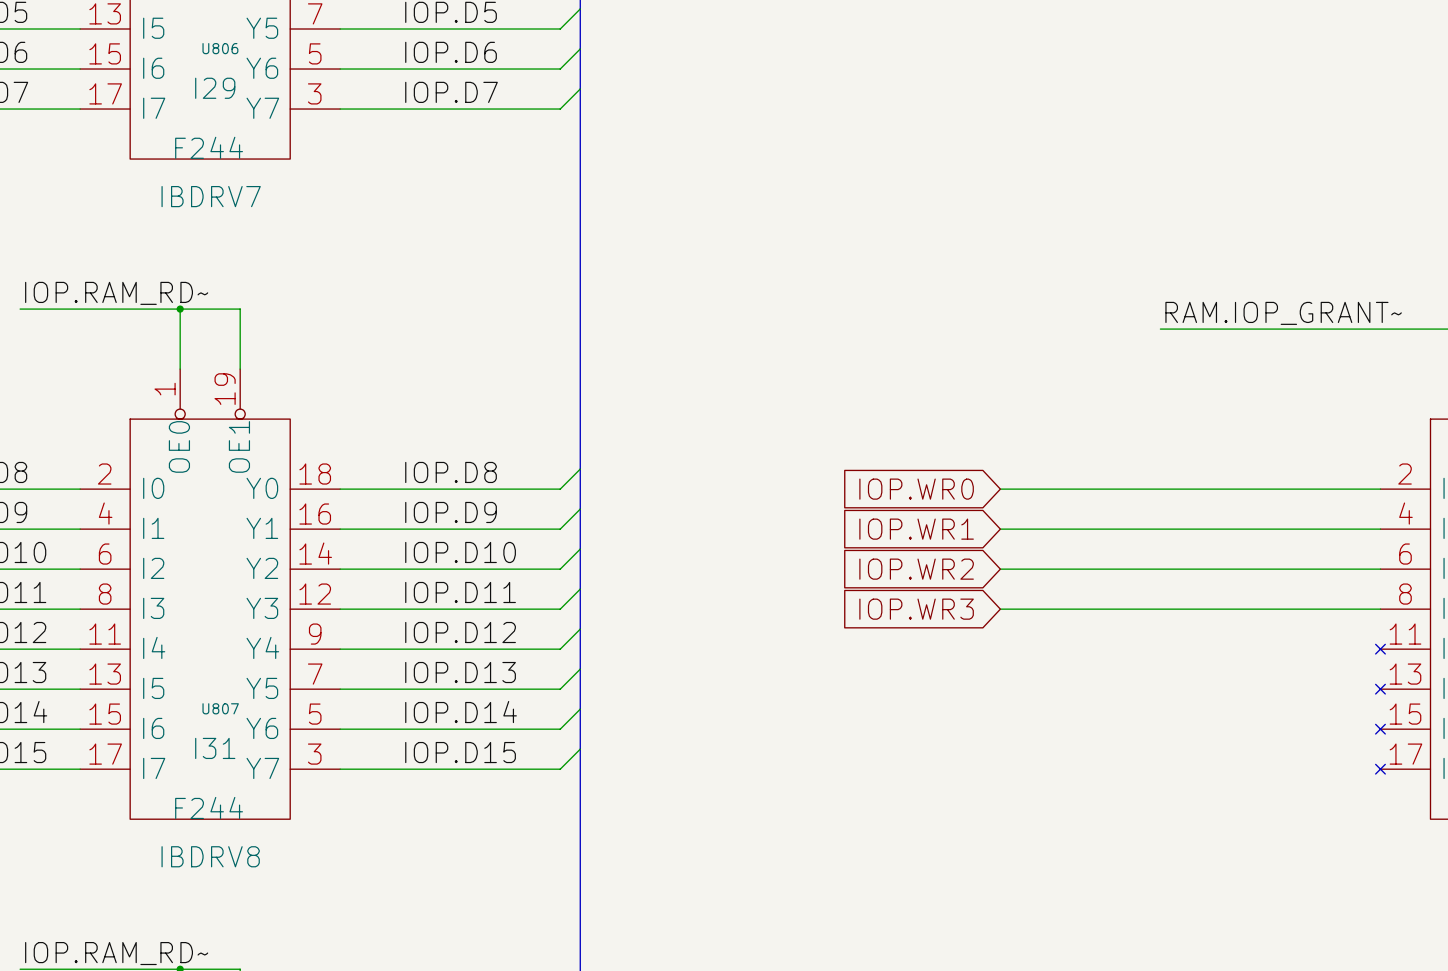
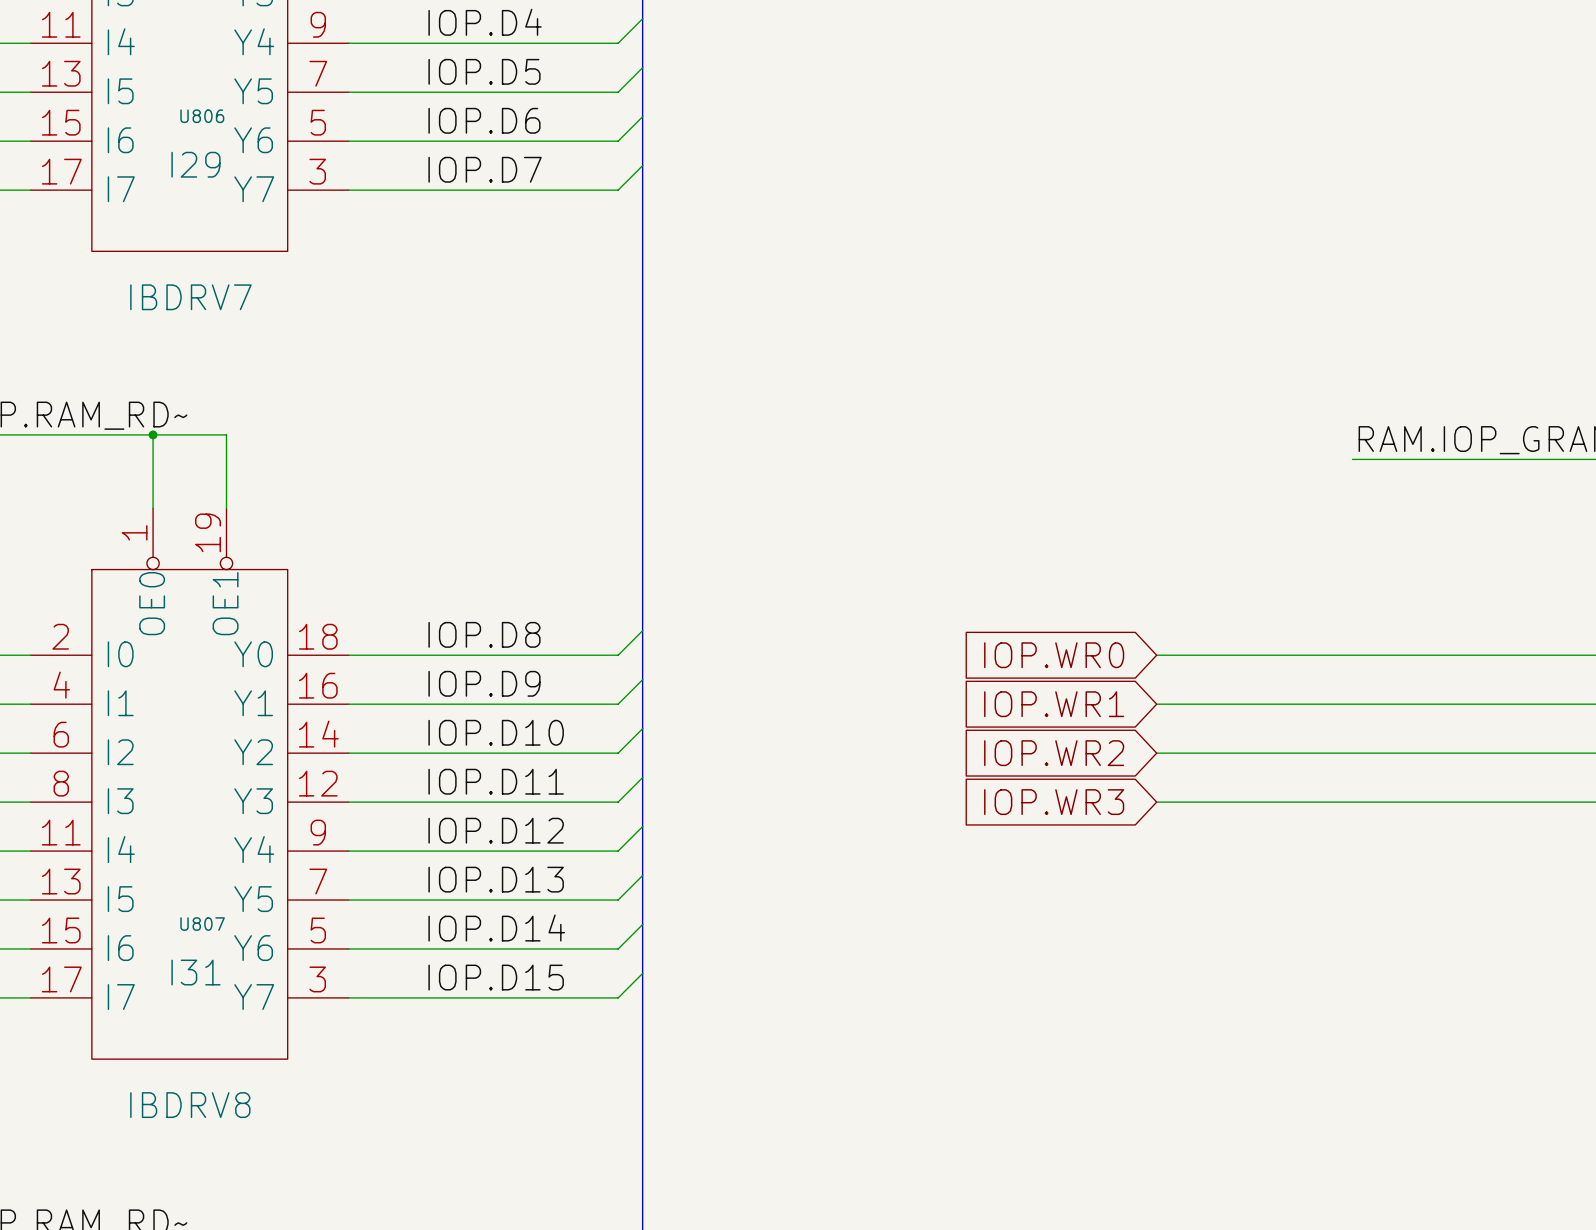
U806 value: F244 (209, 147) -> none
U807 value: F244 (209, 807) -> none

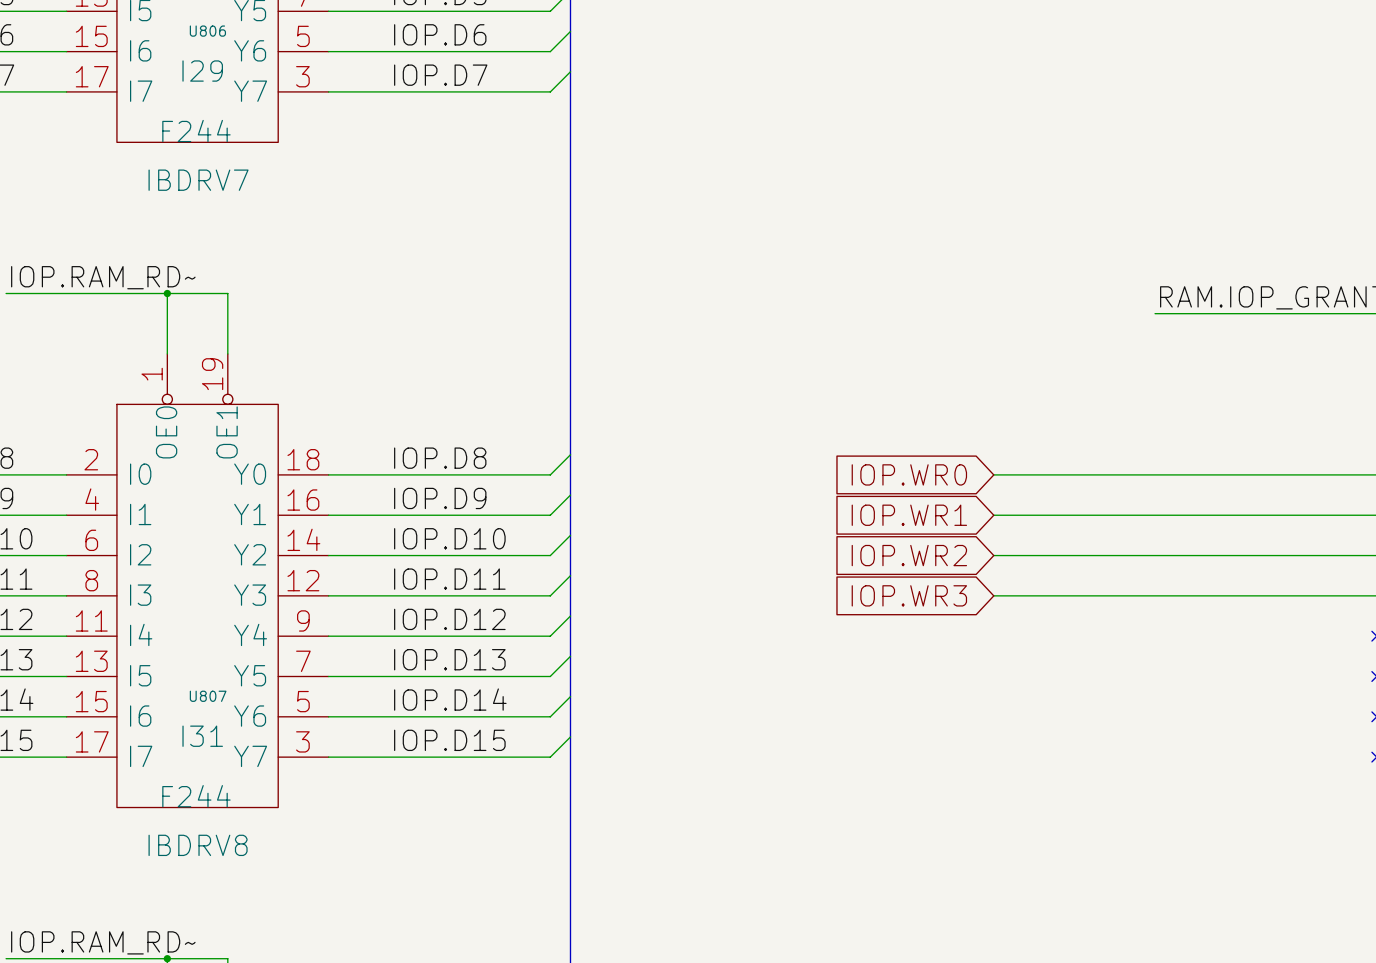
U806 value: none -> F244 (196, 131)
U807 value: none -> F244 (196, 796)

